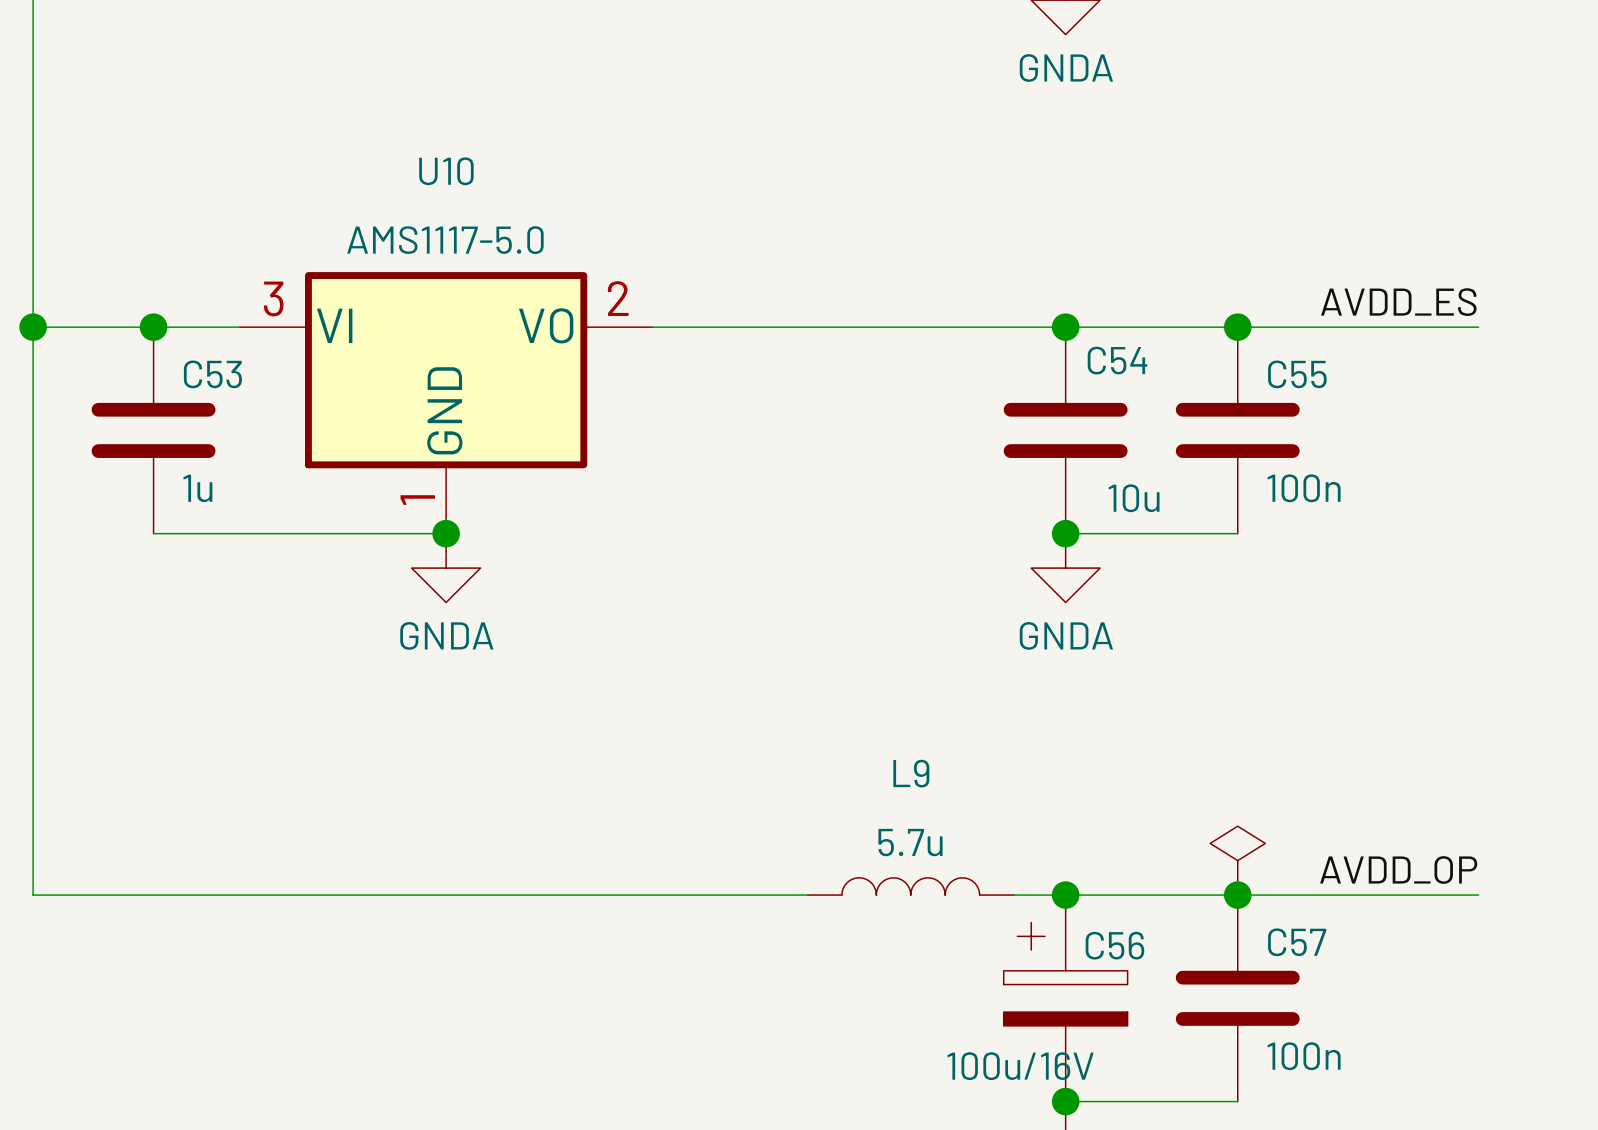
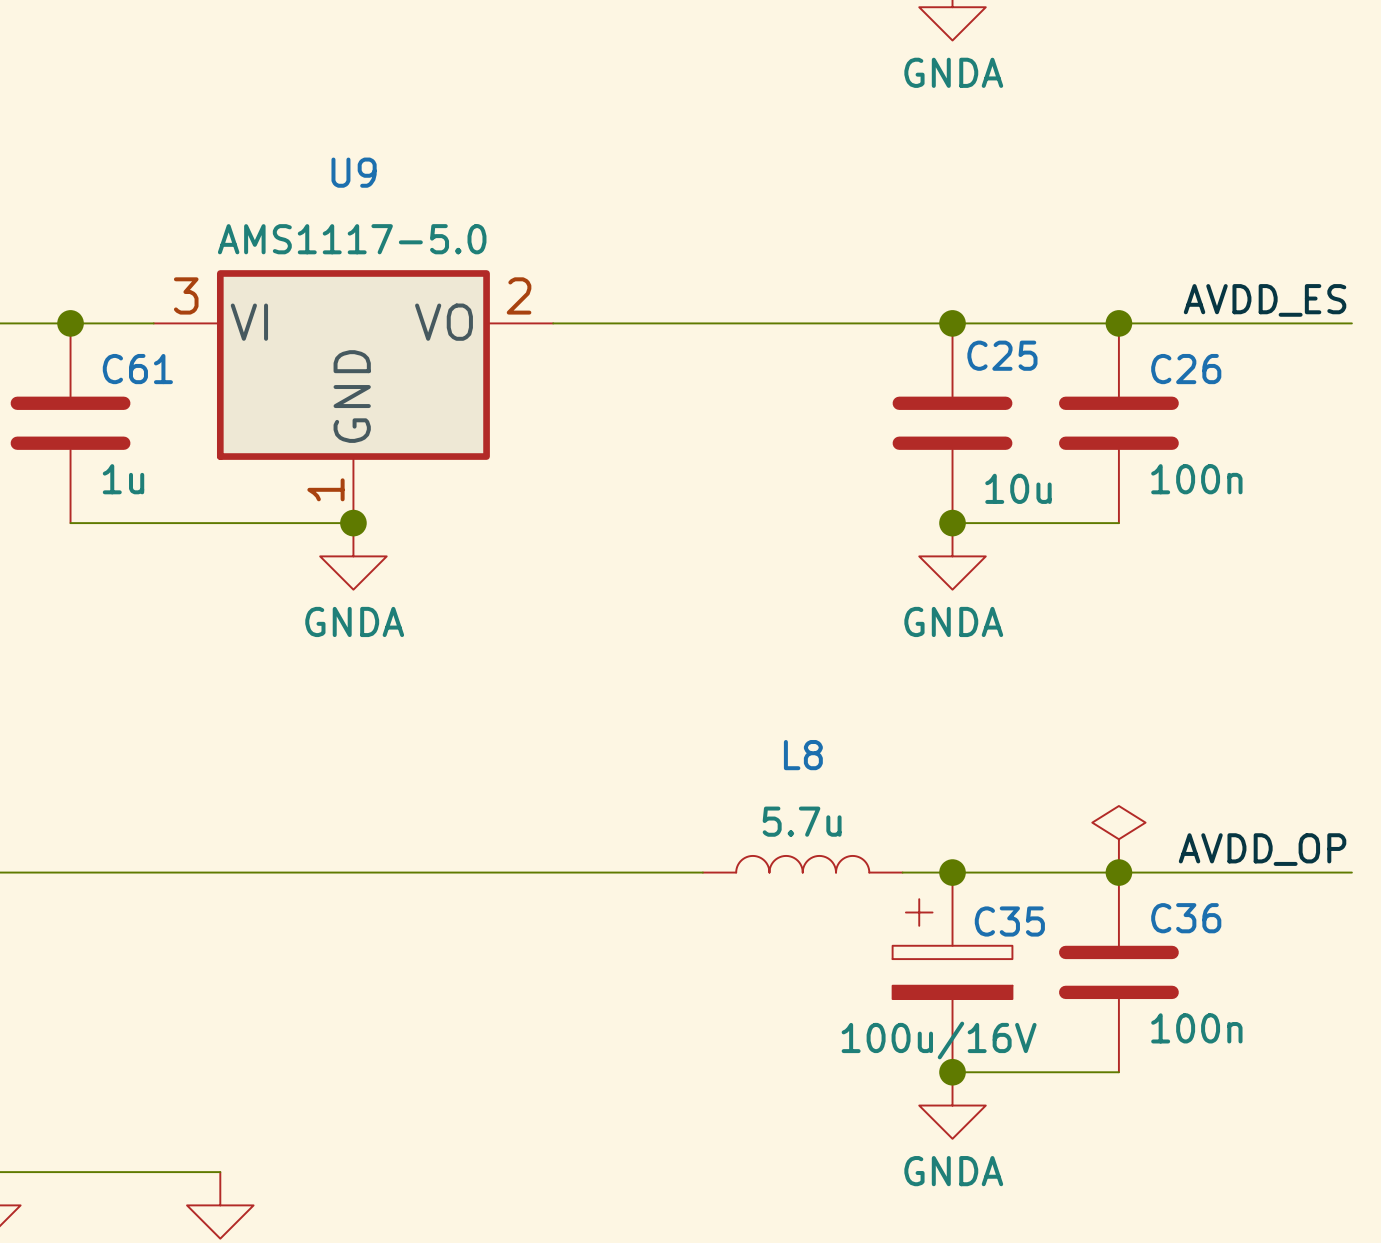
U10 name: U10 (446, 171) -> U9 (354, 172)
C54 name: C54 (1117, 360) -> C25 (1002, 355)
C53 name: C53 (212, 374) -> C61 (137, 369)
C55 name: C55 (1297, 374) -> C26 (1186, 369)
L9 name: L9 (911, 773) -> L8 (803, 755)
C57 name: C57 (1297, 942) -> C36 (1186, 918)
C56 name: C56 (1114, 945) -> C35 (1009, 921)

